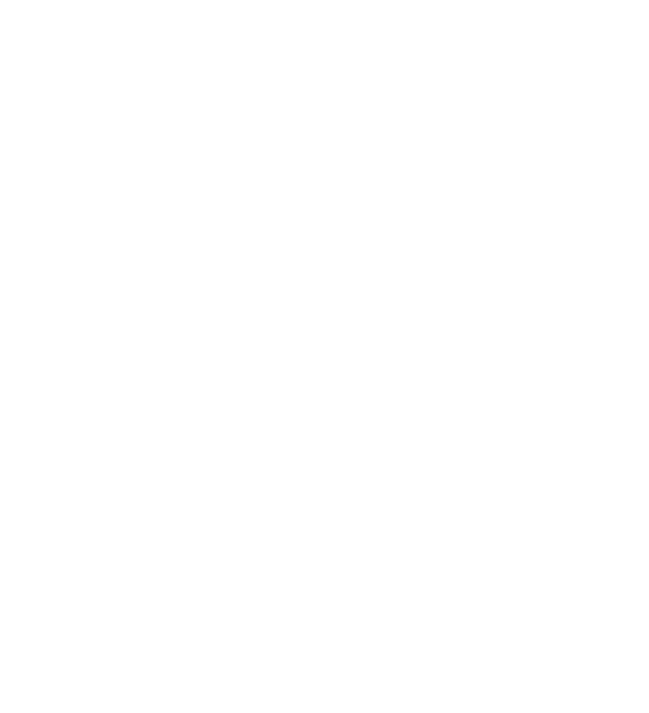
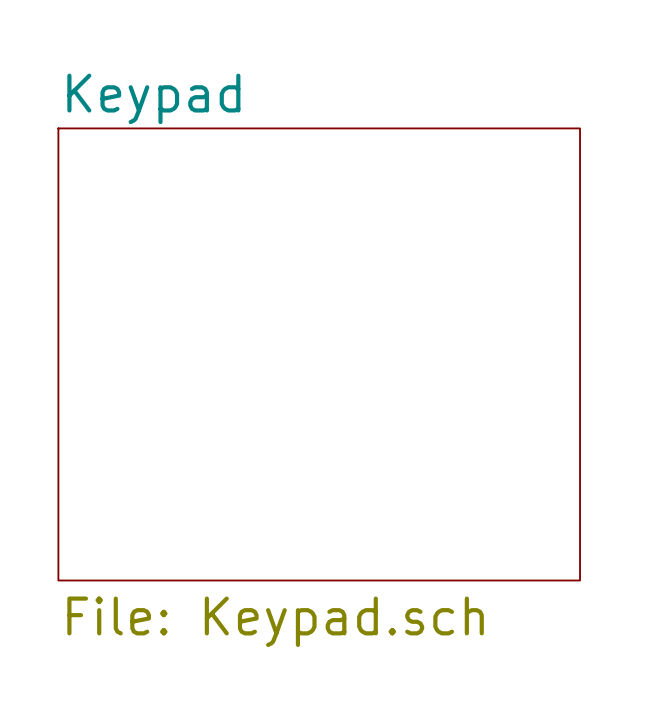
sheet Keypad: none -> File: Keypad.sch (319, 354)

